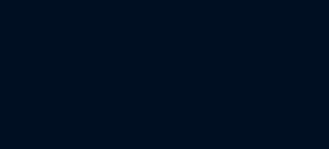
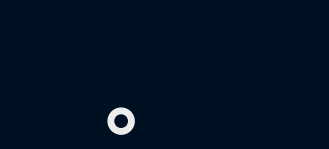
via: none -> (121, 121)

